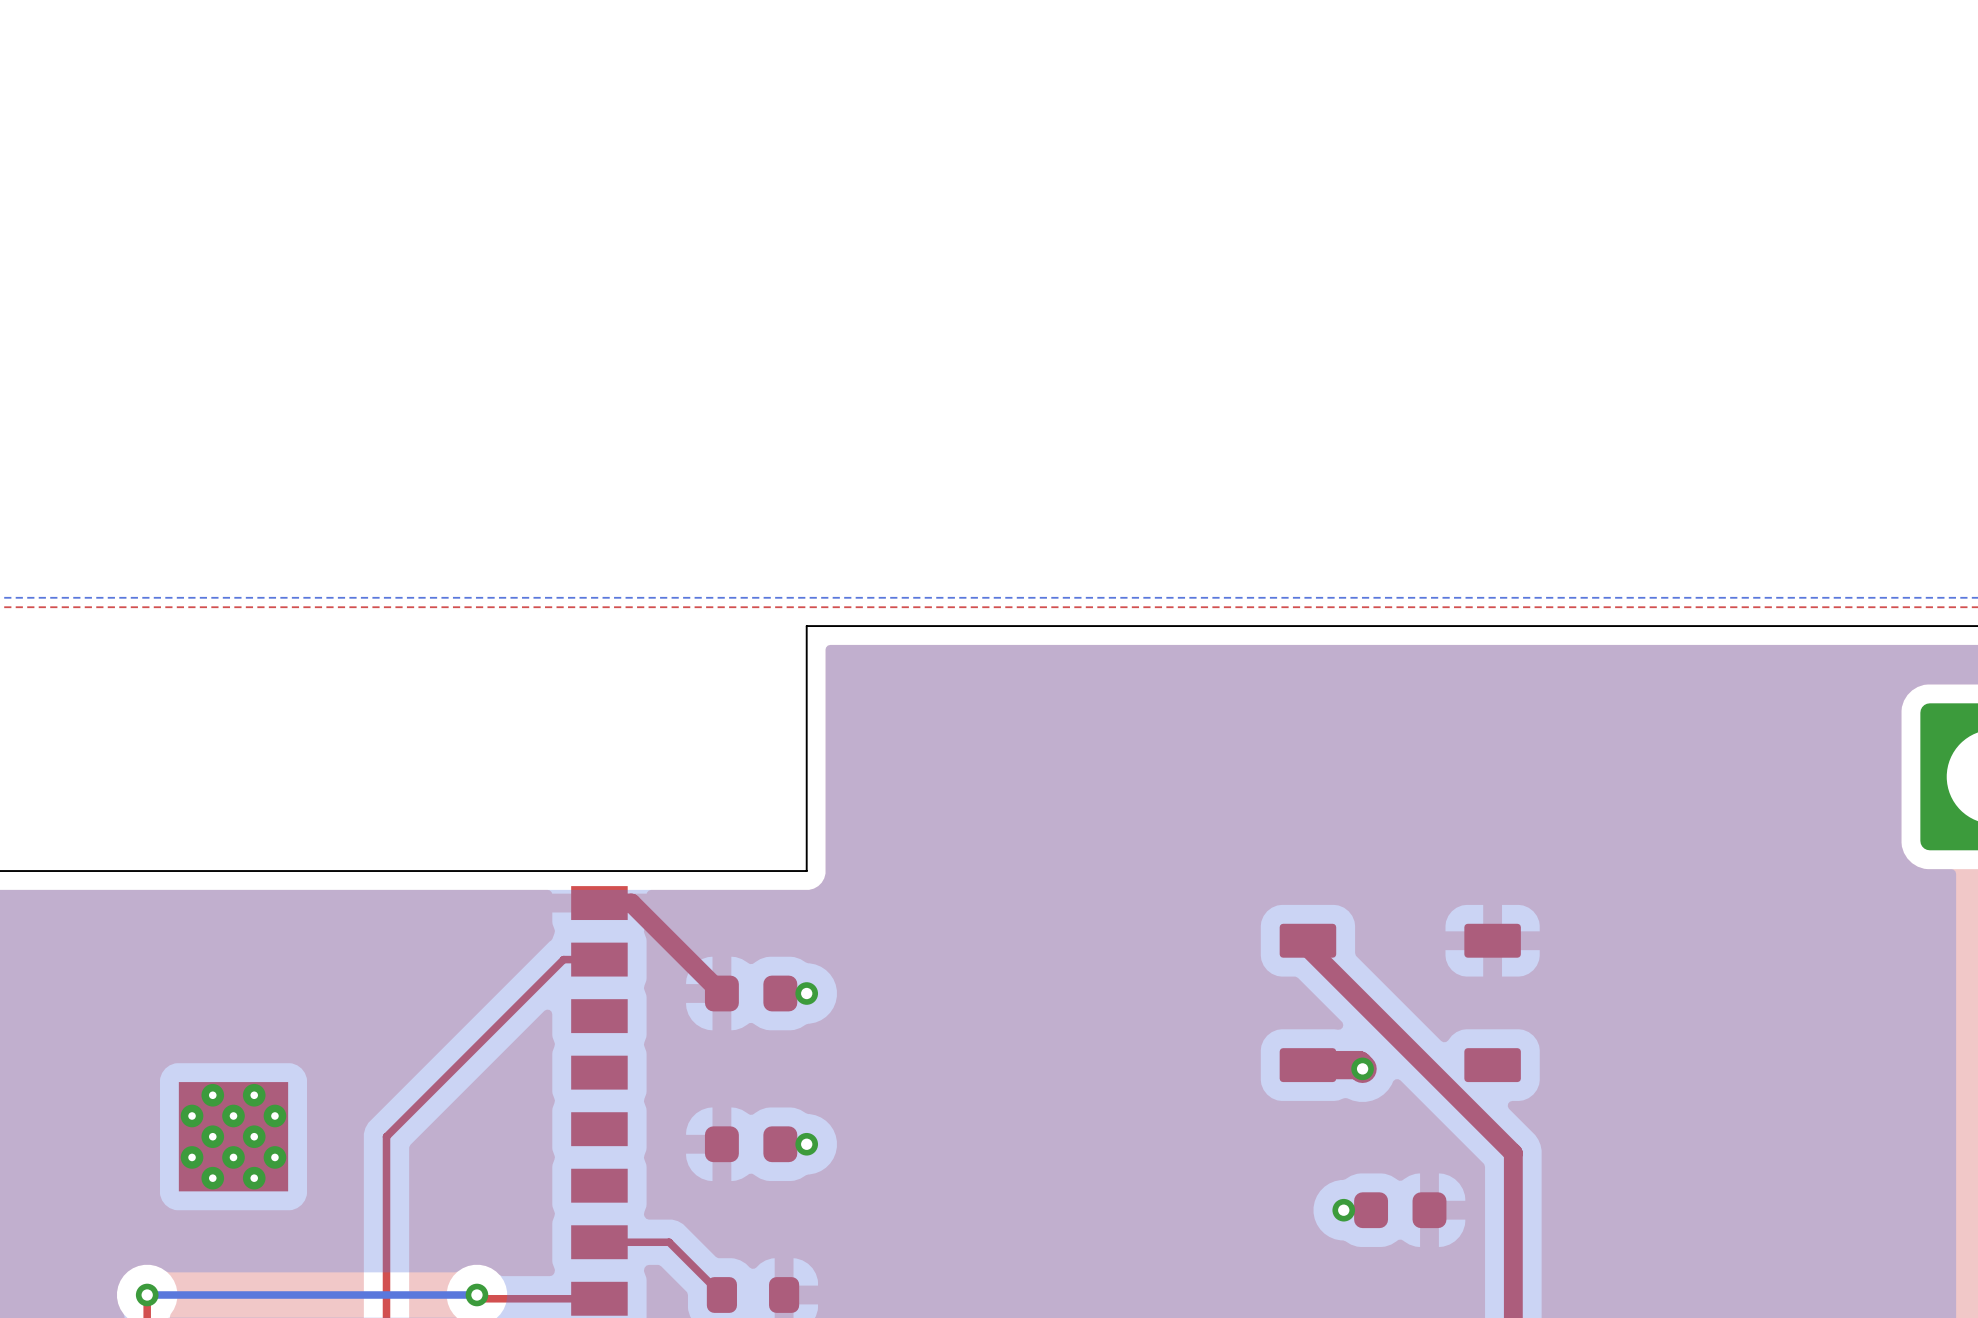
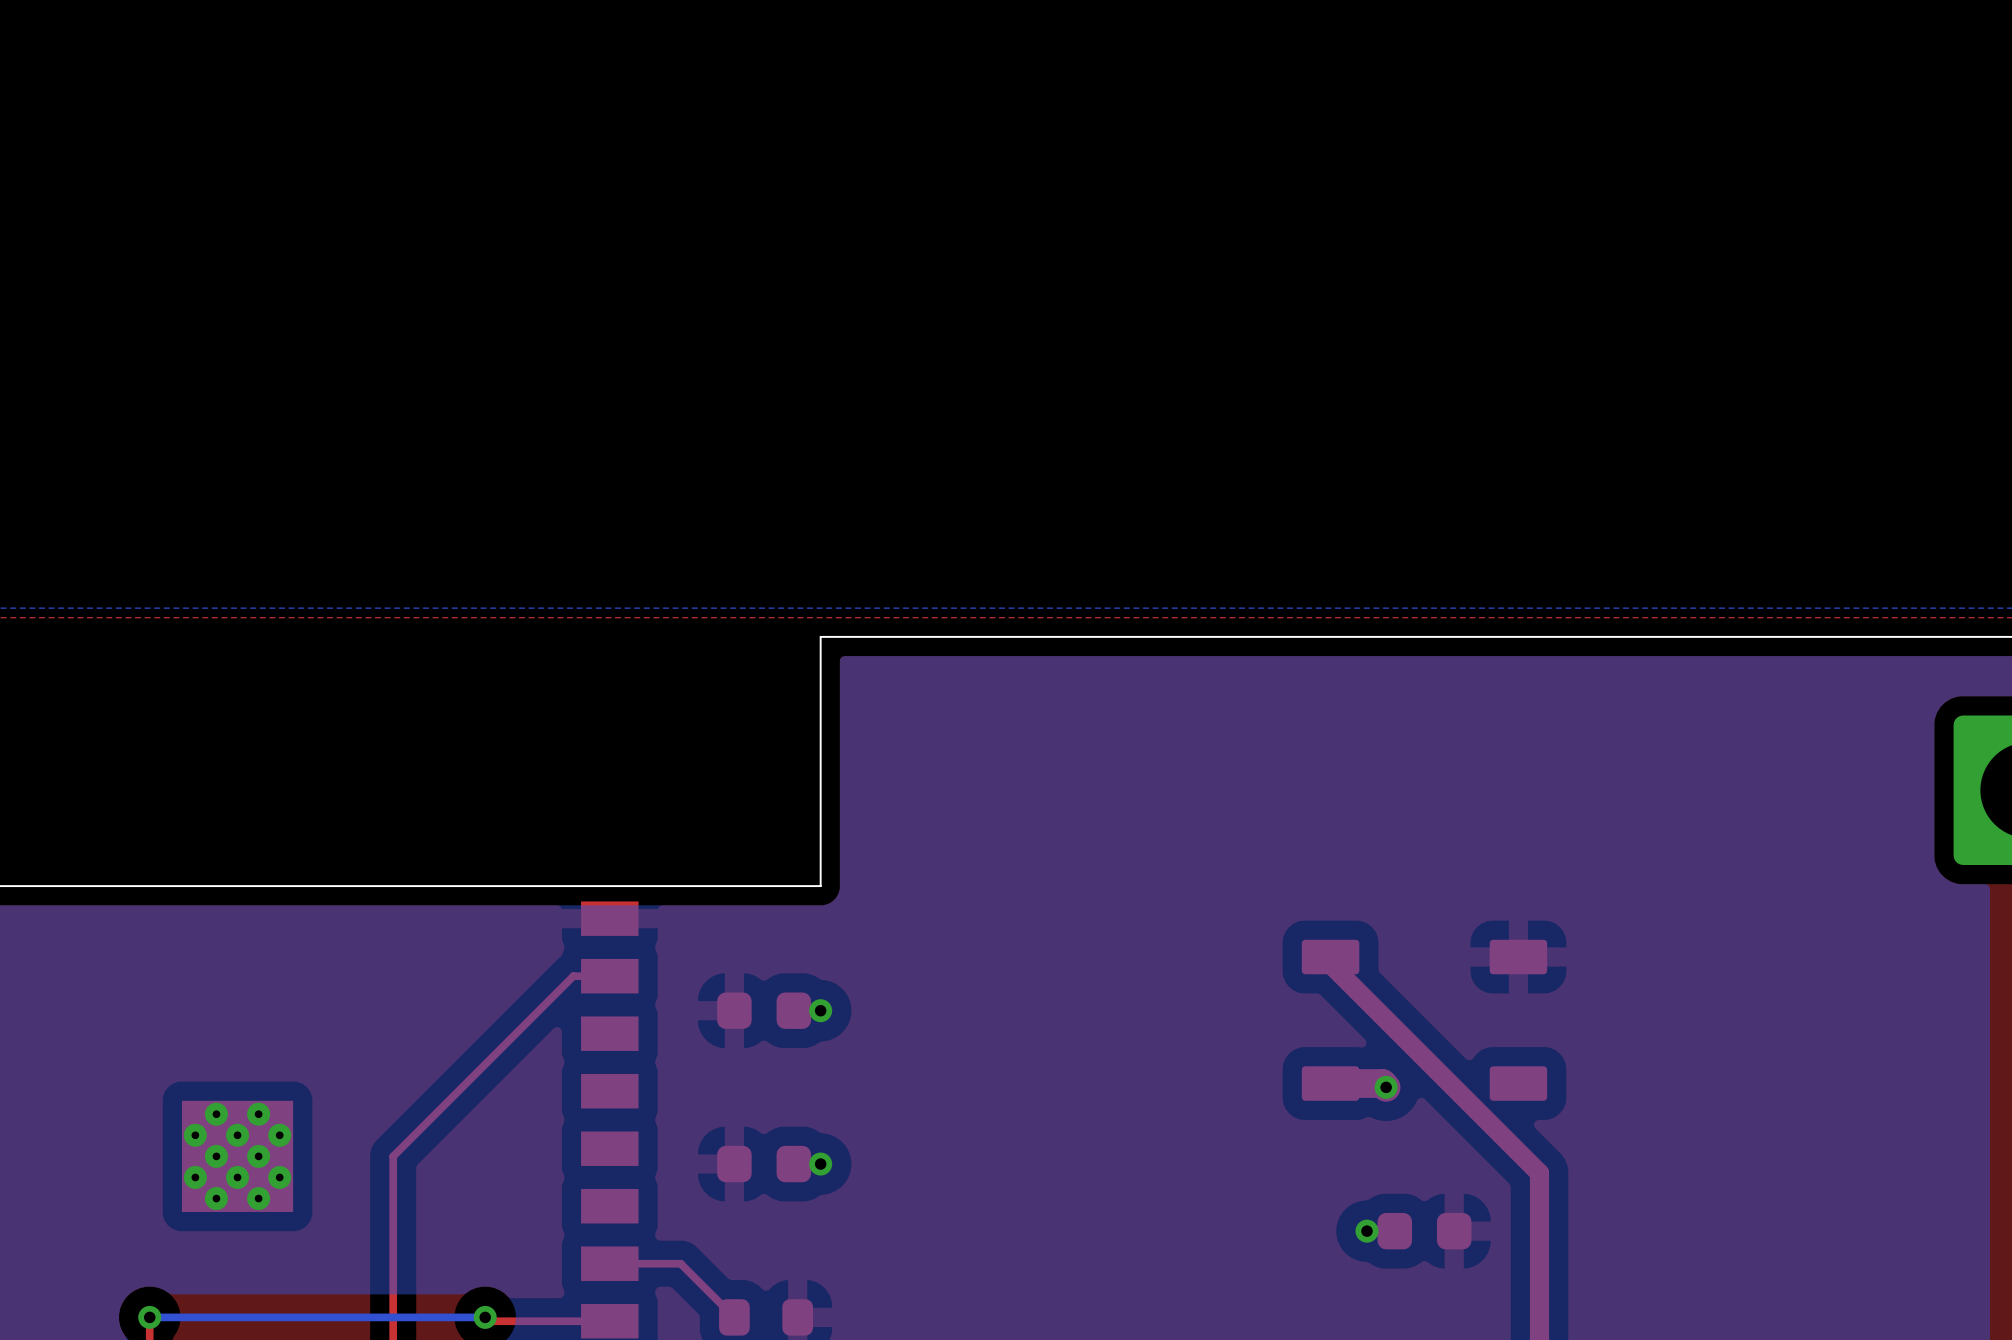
top track: (599, 903) (631, 903) (721, 993) -> none

